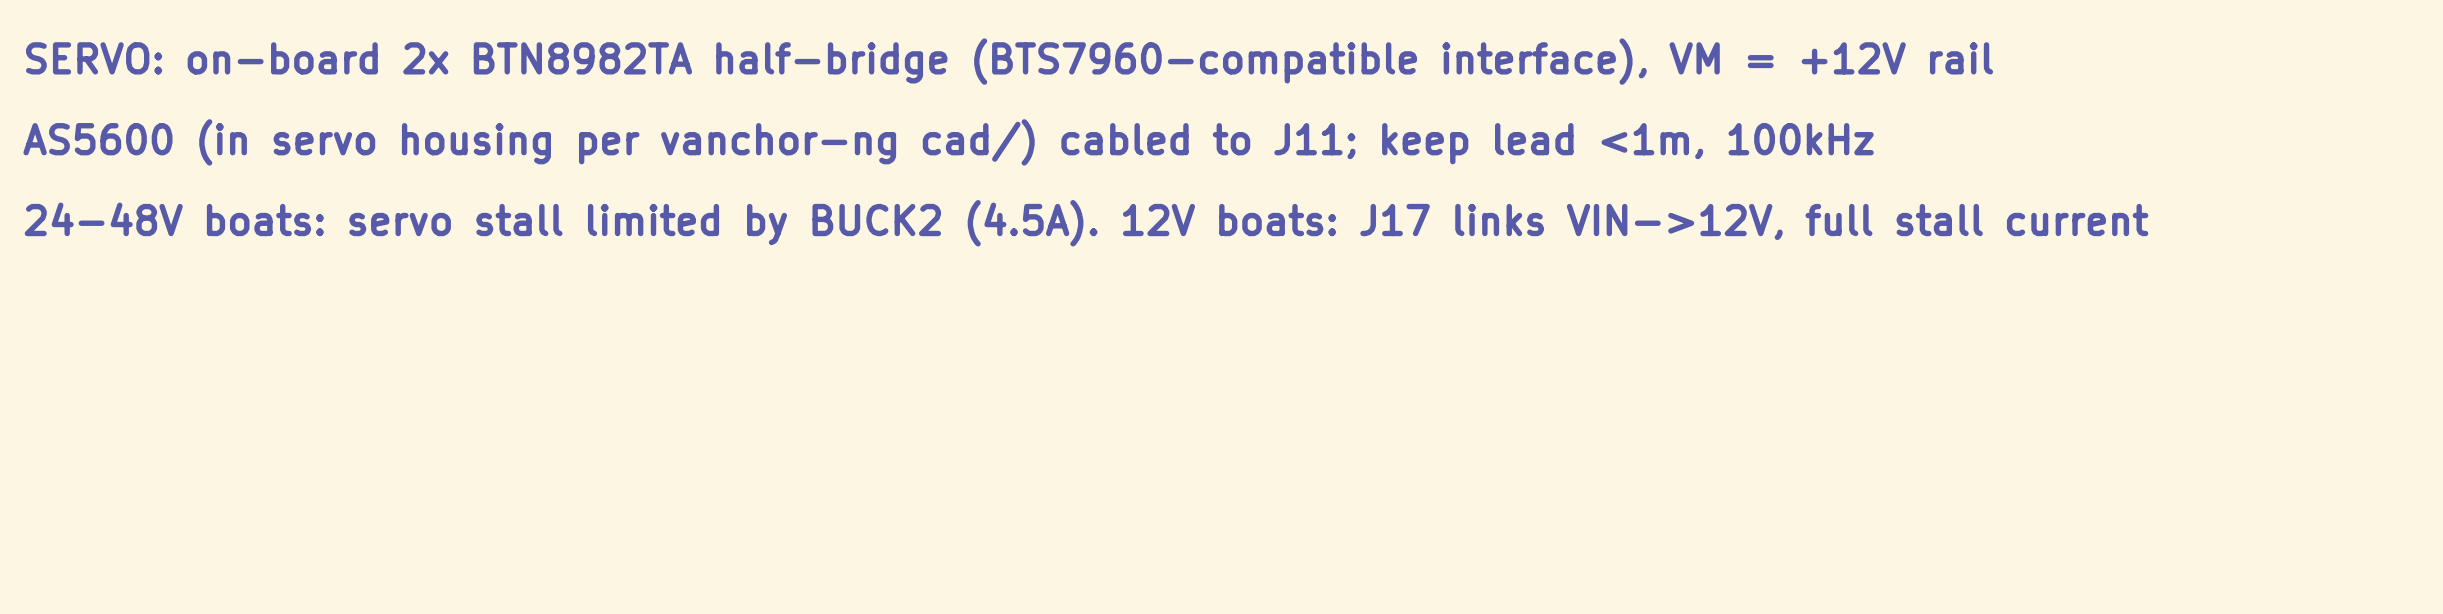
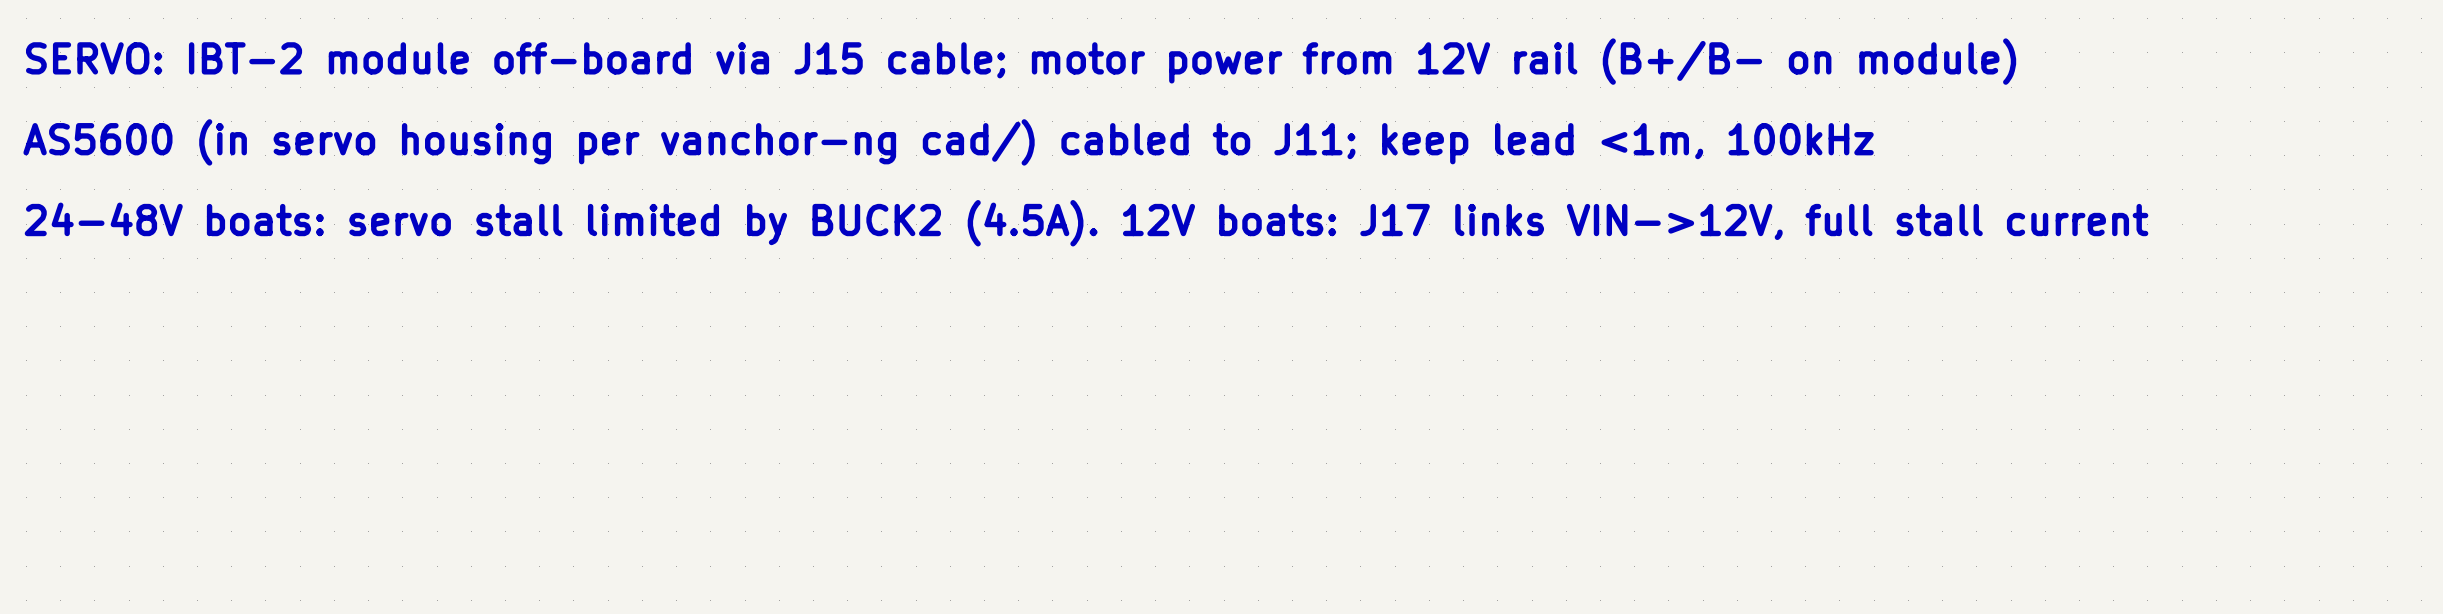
text: SERVO: on-board 2x BTN8982TA half-bridge (BTS7960-compatible interface), VM = +12V rail (1009, 61) -> SERVO: IBT-2 module off-board via J15 cable; motor power from 12V rail (B+/B- on module) (1021, 61)

